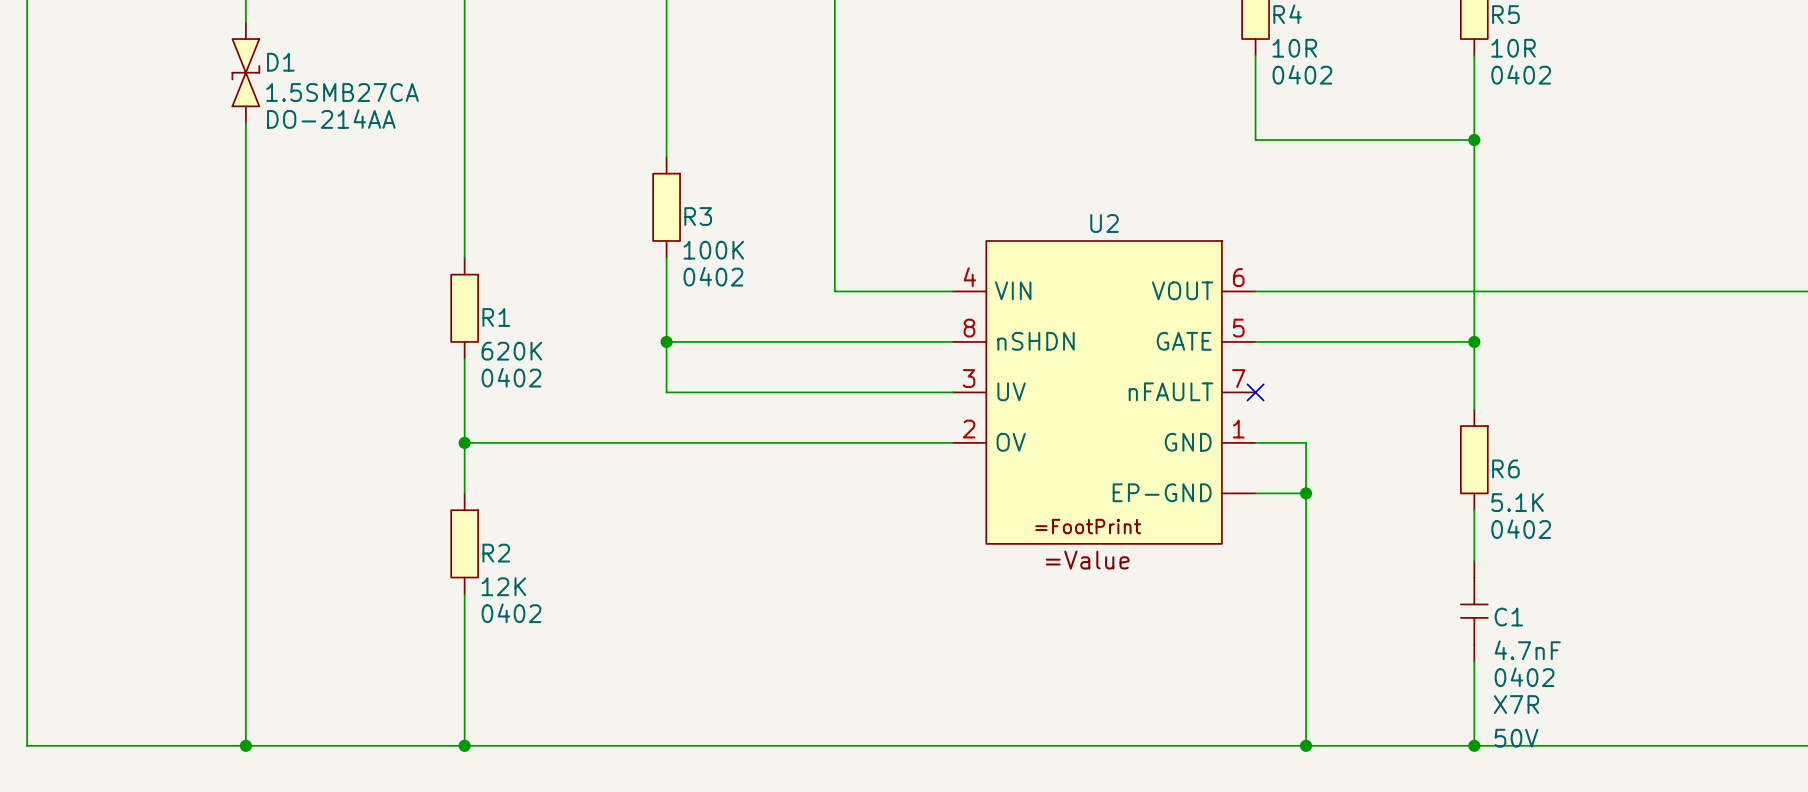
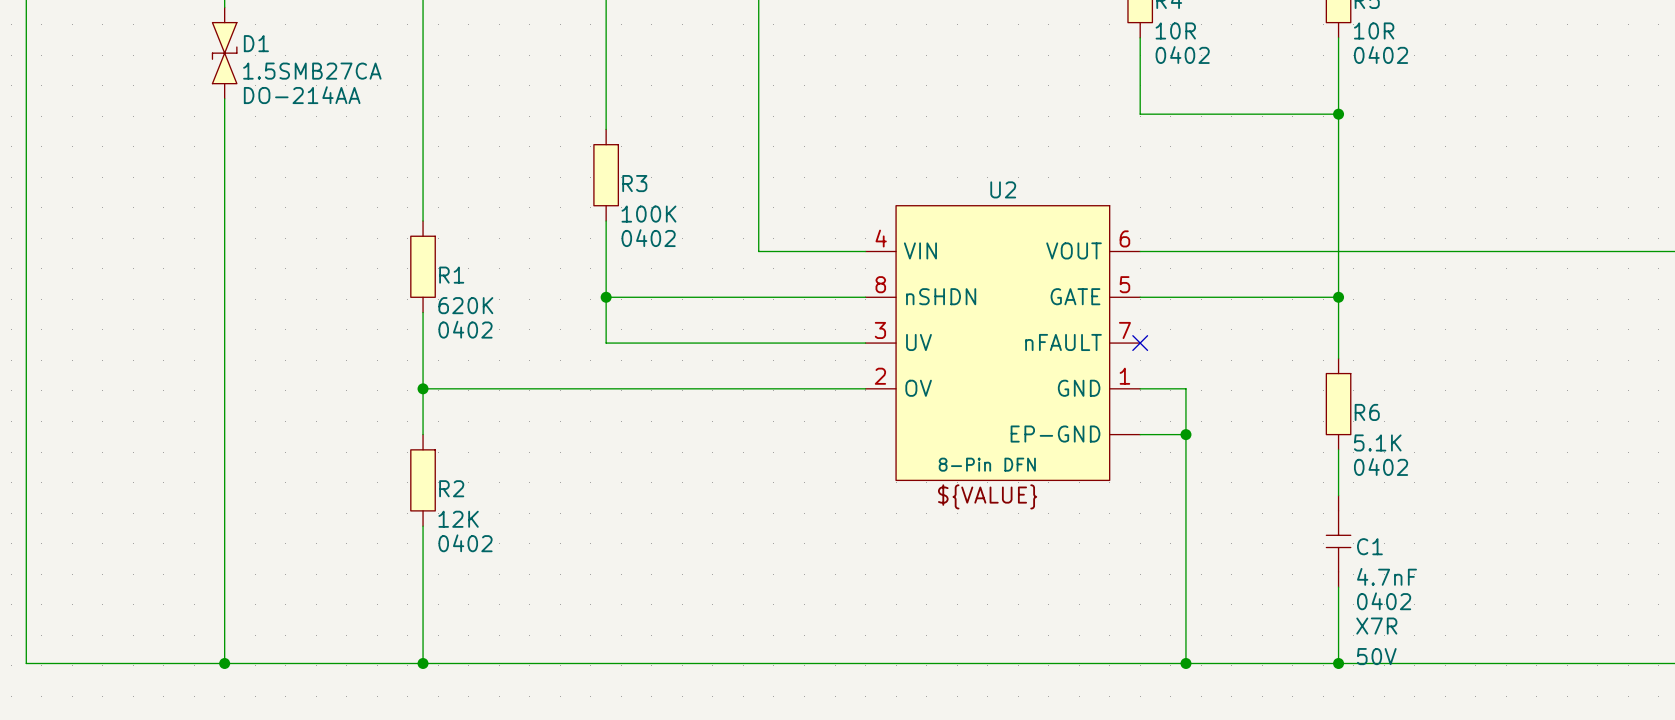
U2 text: none -> 8-Pin DFN (987, 464)
U2 text: =FootPrint (1088, 526) -> none
U2 text: =Value (1087, 560) -> ${VALUE} (987, 496)

